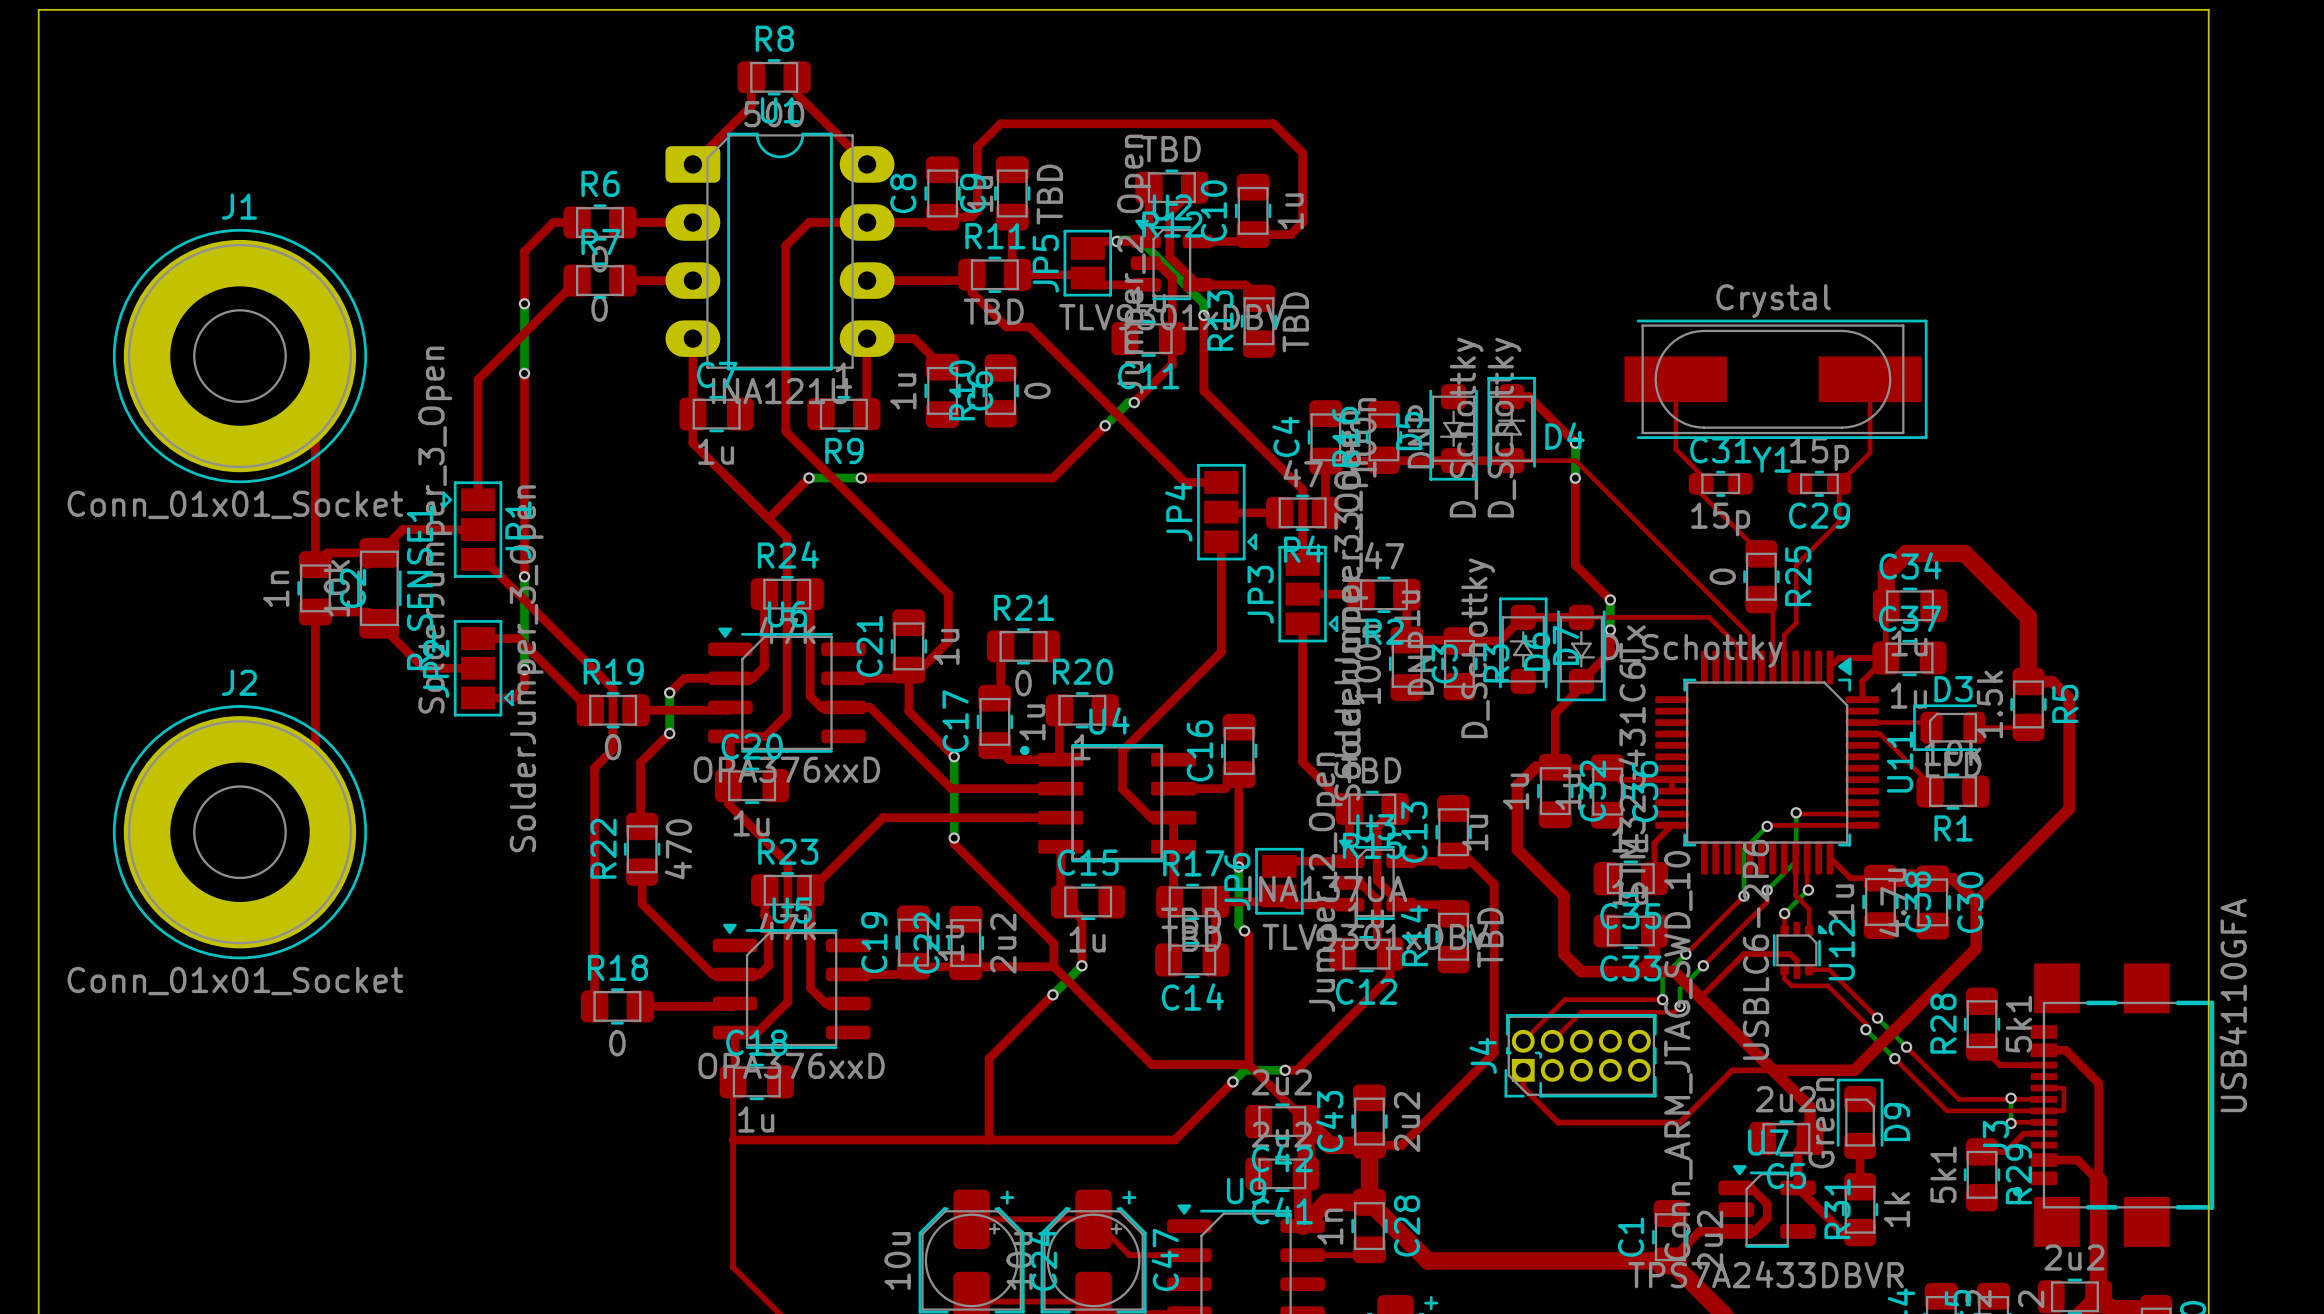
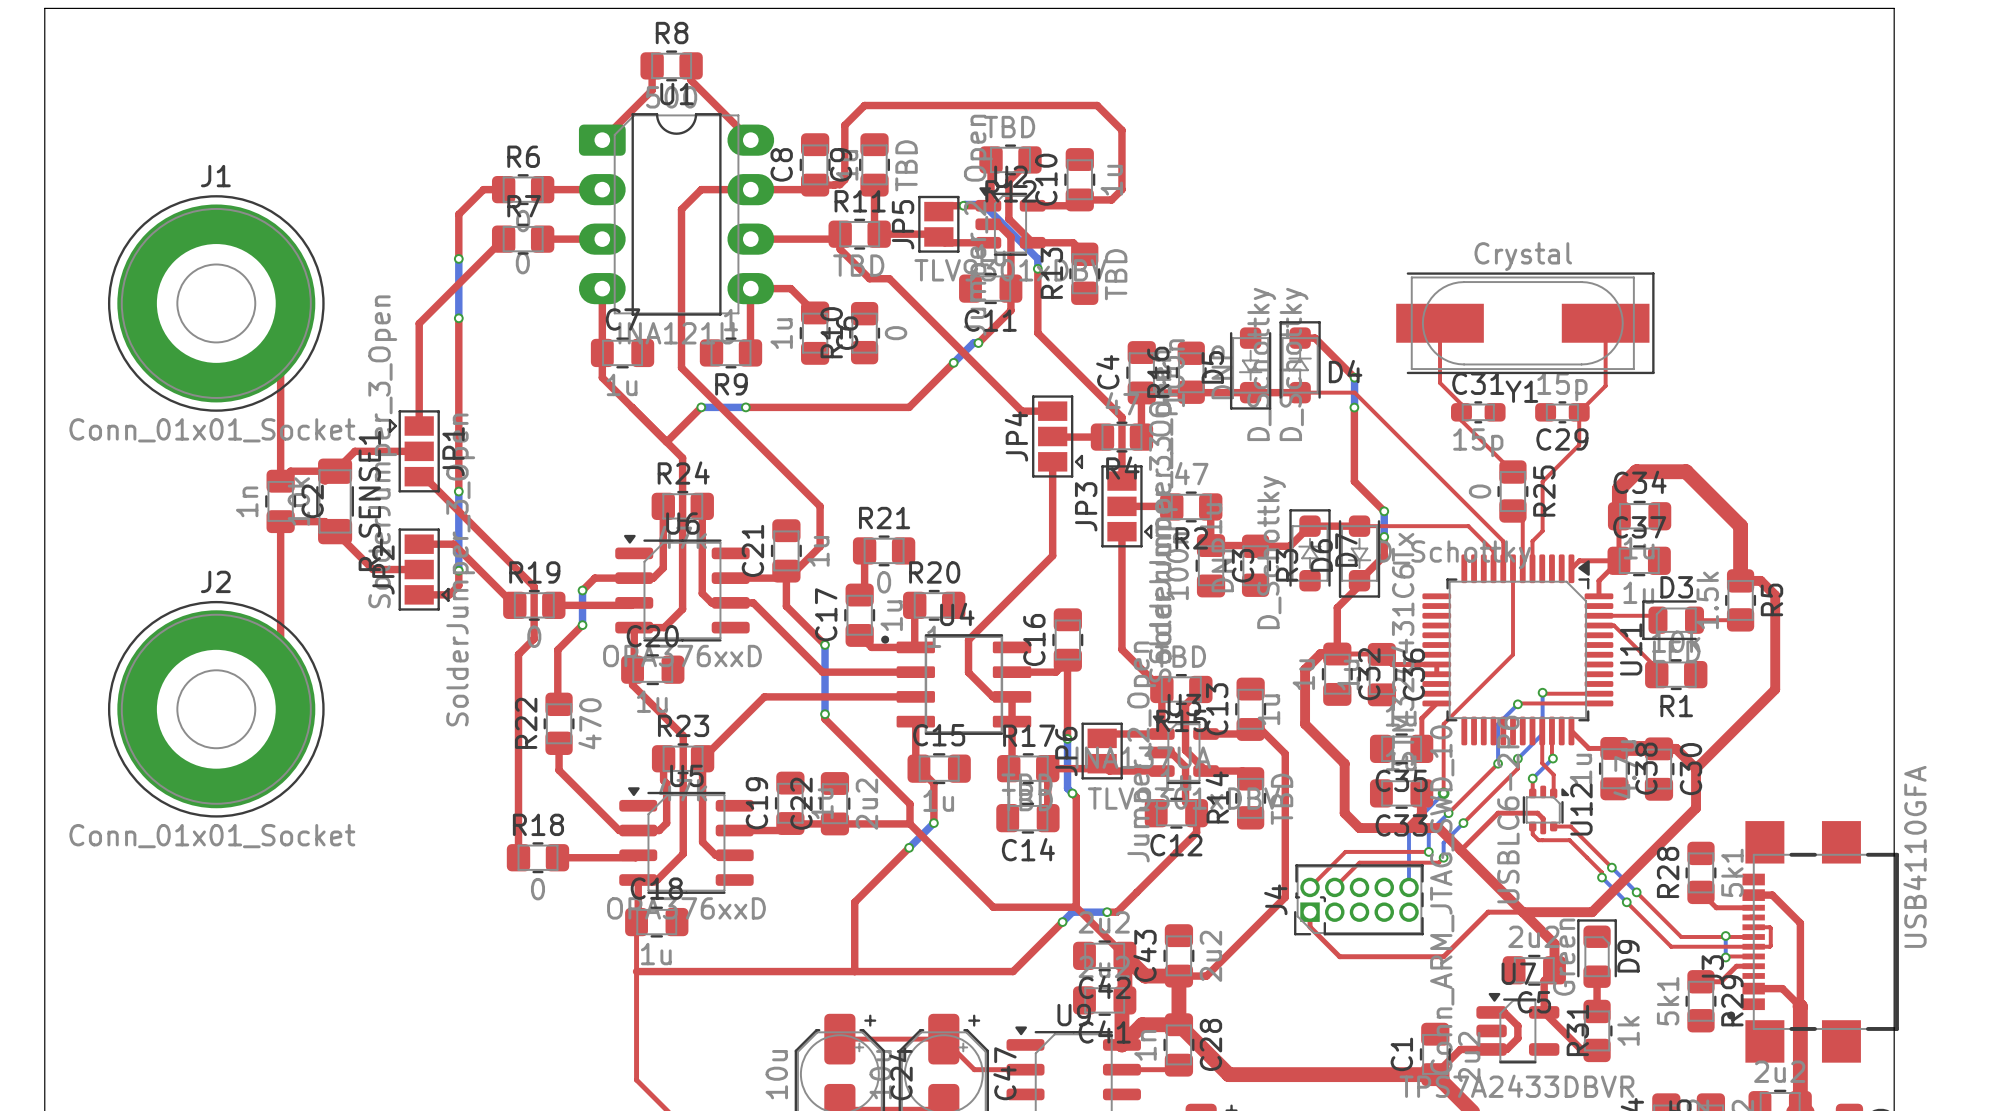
top track: none -> (1513, 568) (1513, 654) (1443, 724) (1443, 793)
bottom track: none -> (1443, 793) (1409, 828) (1409, 887)
via: none -> (1443, 793)

